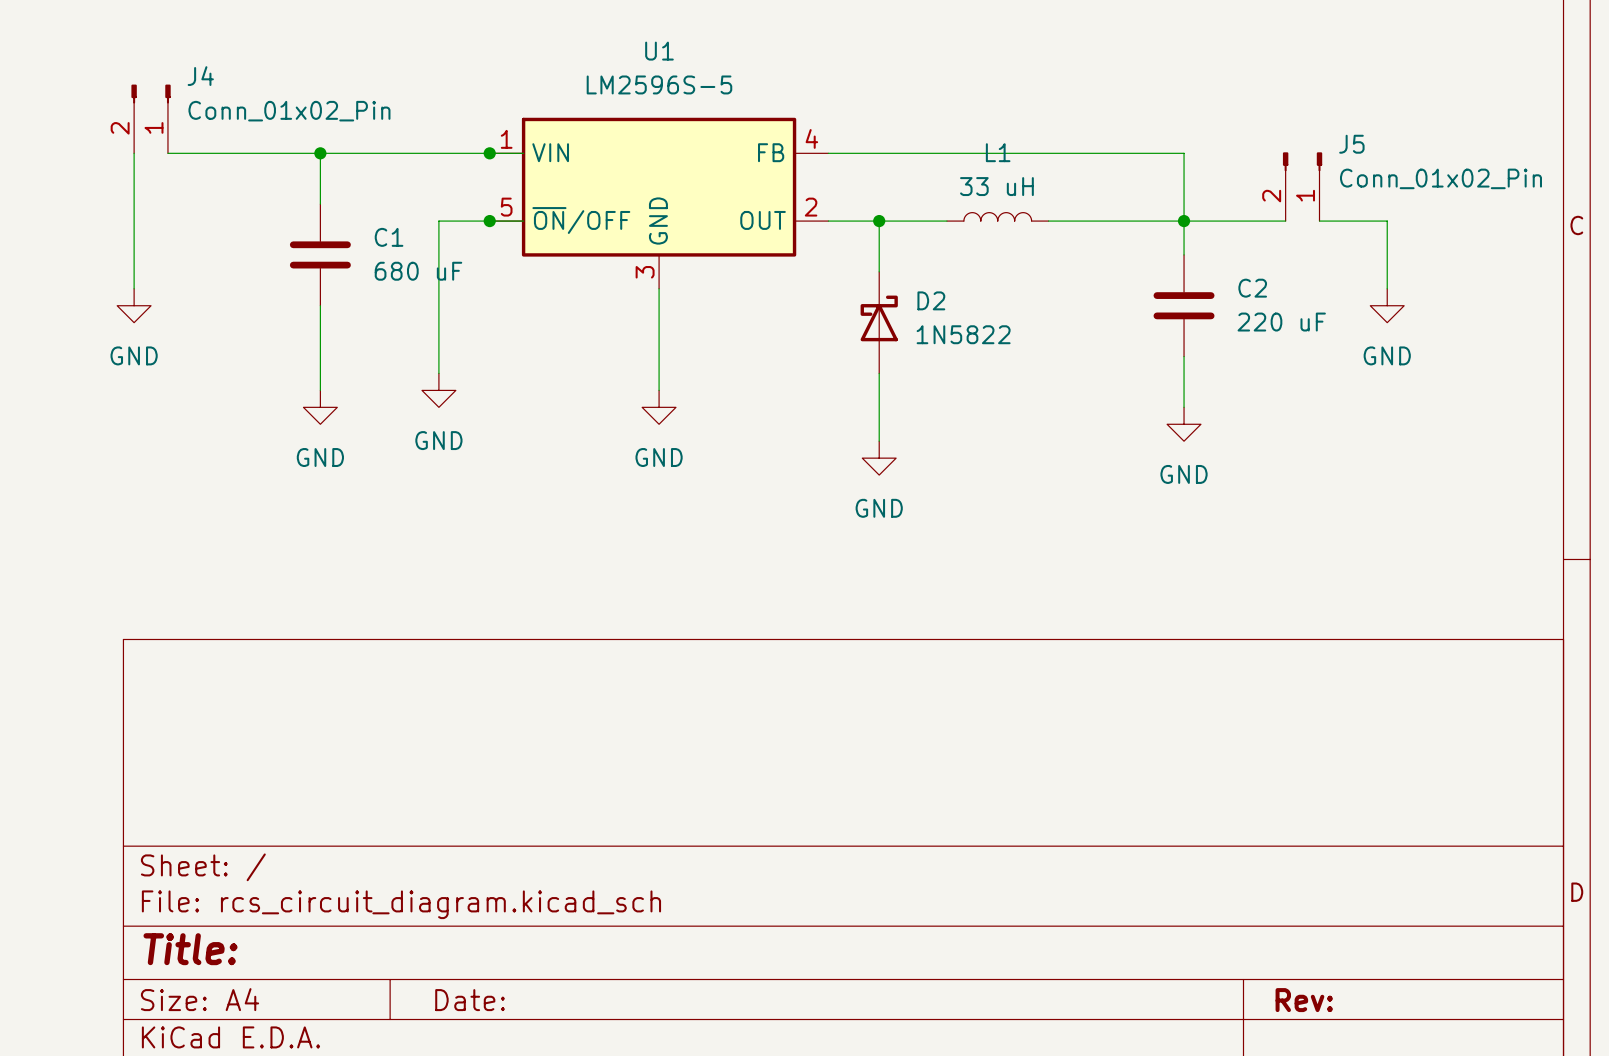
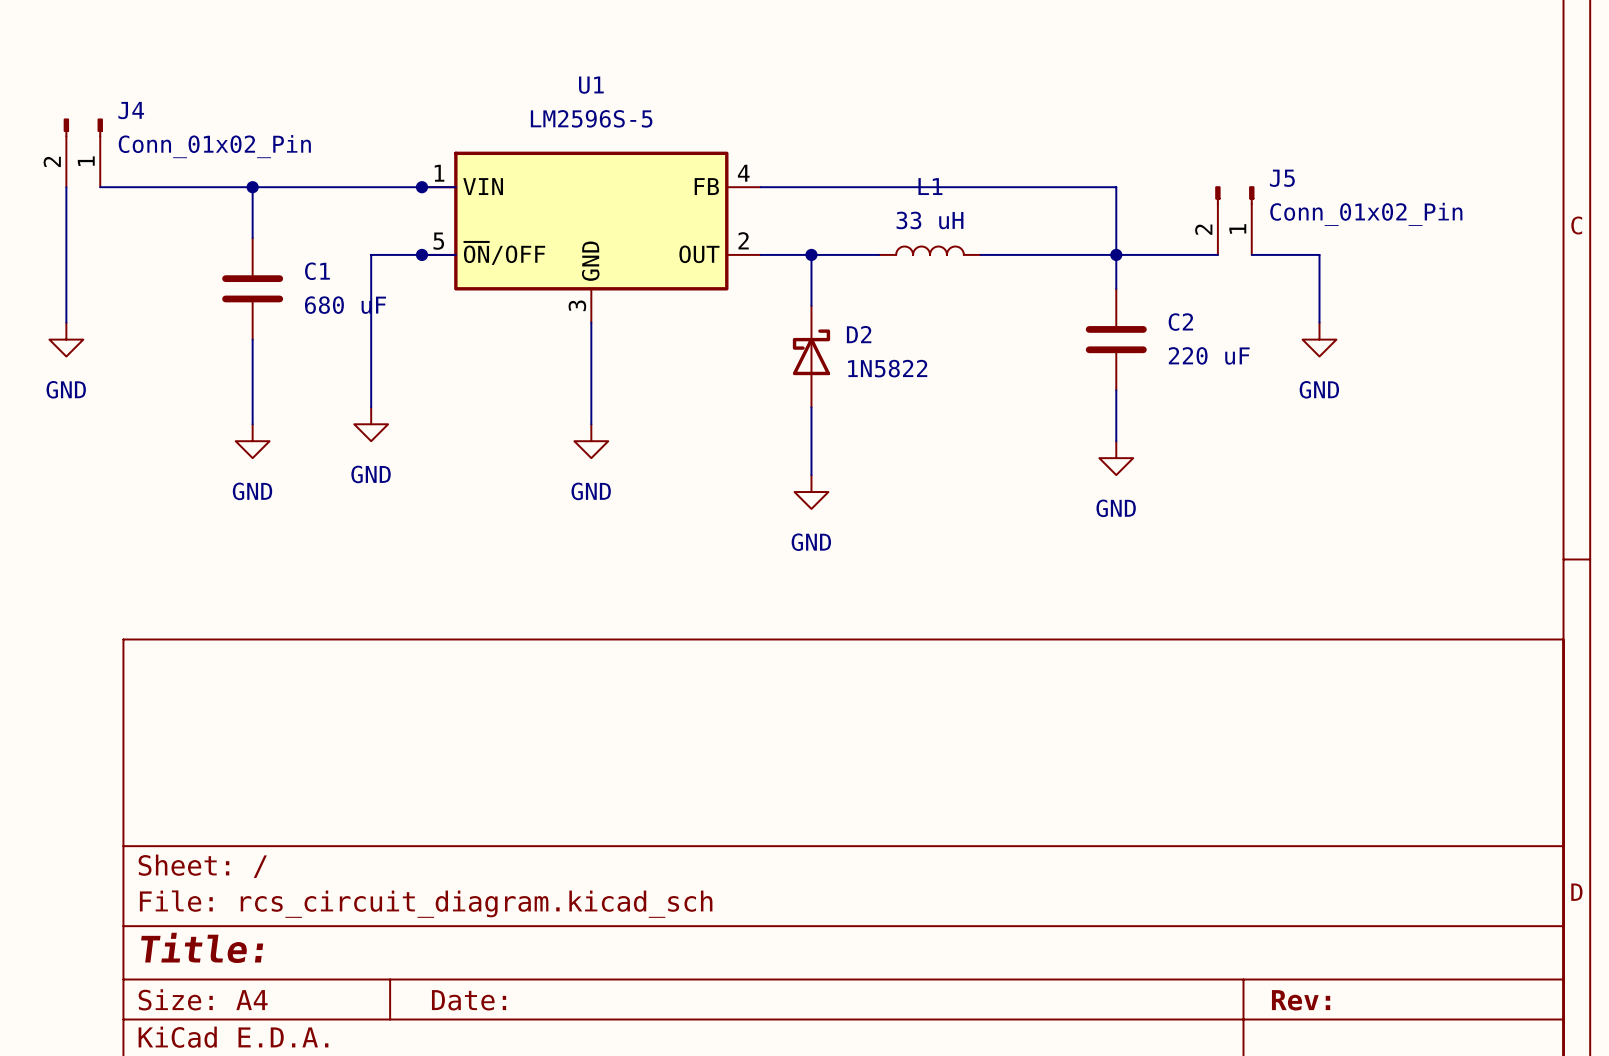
J4 position: (151, 118) -> (83, 152)
wire: (134, 153) (134, 288) -> (66, 187) (66, 322)
wire: (167, 153) (523, 153) -> (100, 187) (455, 187)
wire: (320, 153) (320, 204) -> (252, 187) (252, 238)
junction: (320, 153) -> none
junction: (489, 153) -> none
wire: (828, 153) (1184, 153) (1184, 254) -> (760, 187) (1116, 187) (1116, 288)
J5 position: (1302, 186) -> (1234, 220)
junction: none -> (252, 187)
junction: none -> (421, 187)
U1 position: (659, 203) -> (591, 237)
L1 position: (997, 216) -> (930, 250)
junction: (489, 221) -> none
wire: (523, 221) (438, 221) (438, 373) -> (455, 254) (371, 254) (371, 407)
wire: (828, 221) (946, 221) -> (760, 254) (879, 254)
wire: (879, 221) (879, 271) -> (811, 254) (811, 305)
junction position: (879, 221) -> (811, 254)
wire: (1048, 221) (1285, 221) -> (980, 254) (1217, 254)
junction position: (1184, 221) -> (1116, 254)
wire: (1319, 221) (1387, 221) (1387, 288) -> (1251, 254) (1319, 254) (1319, 322)
C1 position: (320, 254) -> (252, 288)
junction: none -> (421, 254)
wire: (659, 288) (659, 390) -> (591, 322) (591, 424)
power symbol position: GND (134, 305) -> GND (66, 339)
wire: (320, 305) (320, 390) -> (252, 339) (252, 424)
C2 position: (1184, 305) -> (1116, 339)
power symbol position: GND (1387, 305) -> GND (1319, 339)
D2 position: (879, 322) -> (811, 356)
wire: (1184, 356) (1184, 407) -> (1116, 390) (1116, 441)
wire: (879, 373) (879, 441) -> (811, 407) (811, 475)
power symbol: GND (438, 390) -> none
power symbol: GND (320, 407) -> none
power symbol position: GND (659, 407) -> GND (591, 441)
power symbol: none -> GND (371, 424)
power symbol position: GND (1184, 424) -> GND (1116, 458)
power symbol: none -> GND (252, 441)
power symbol position: GND (879, 458) -> GND (811, 492)

